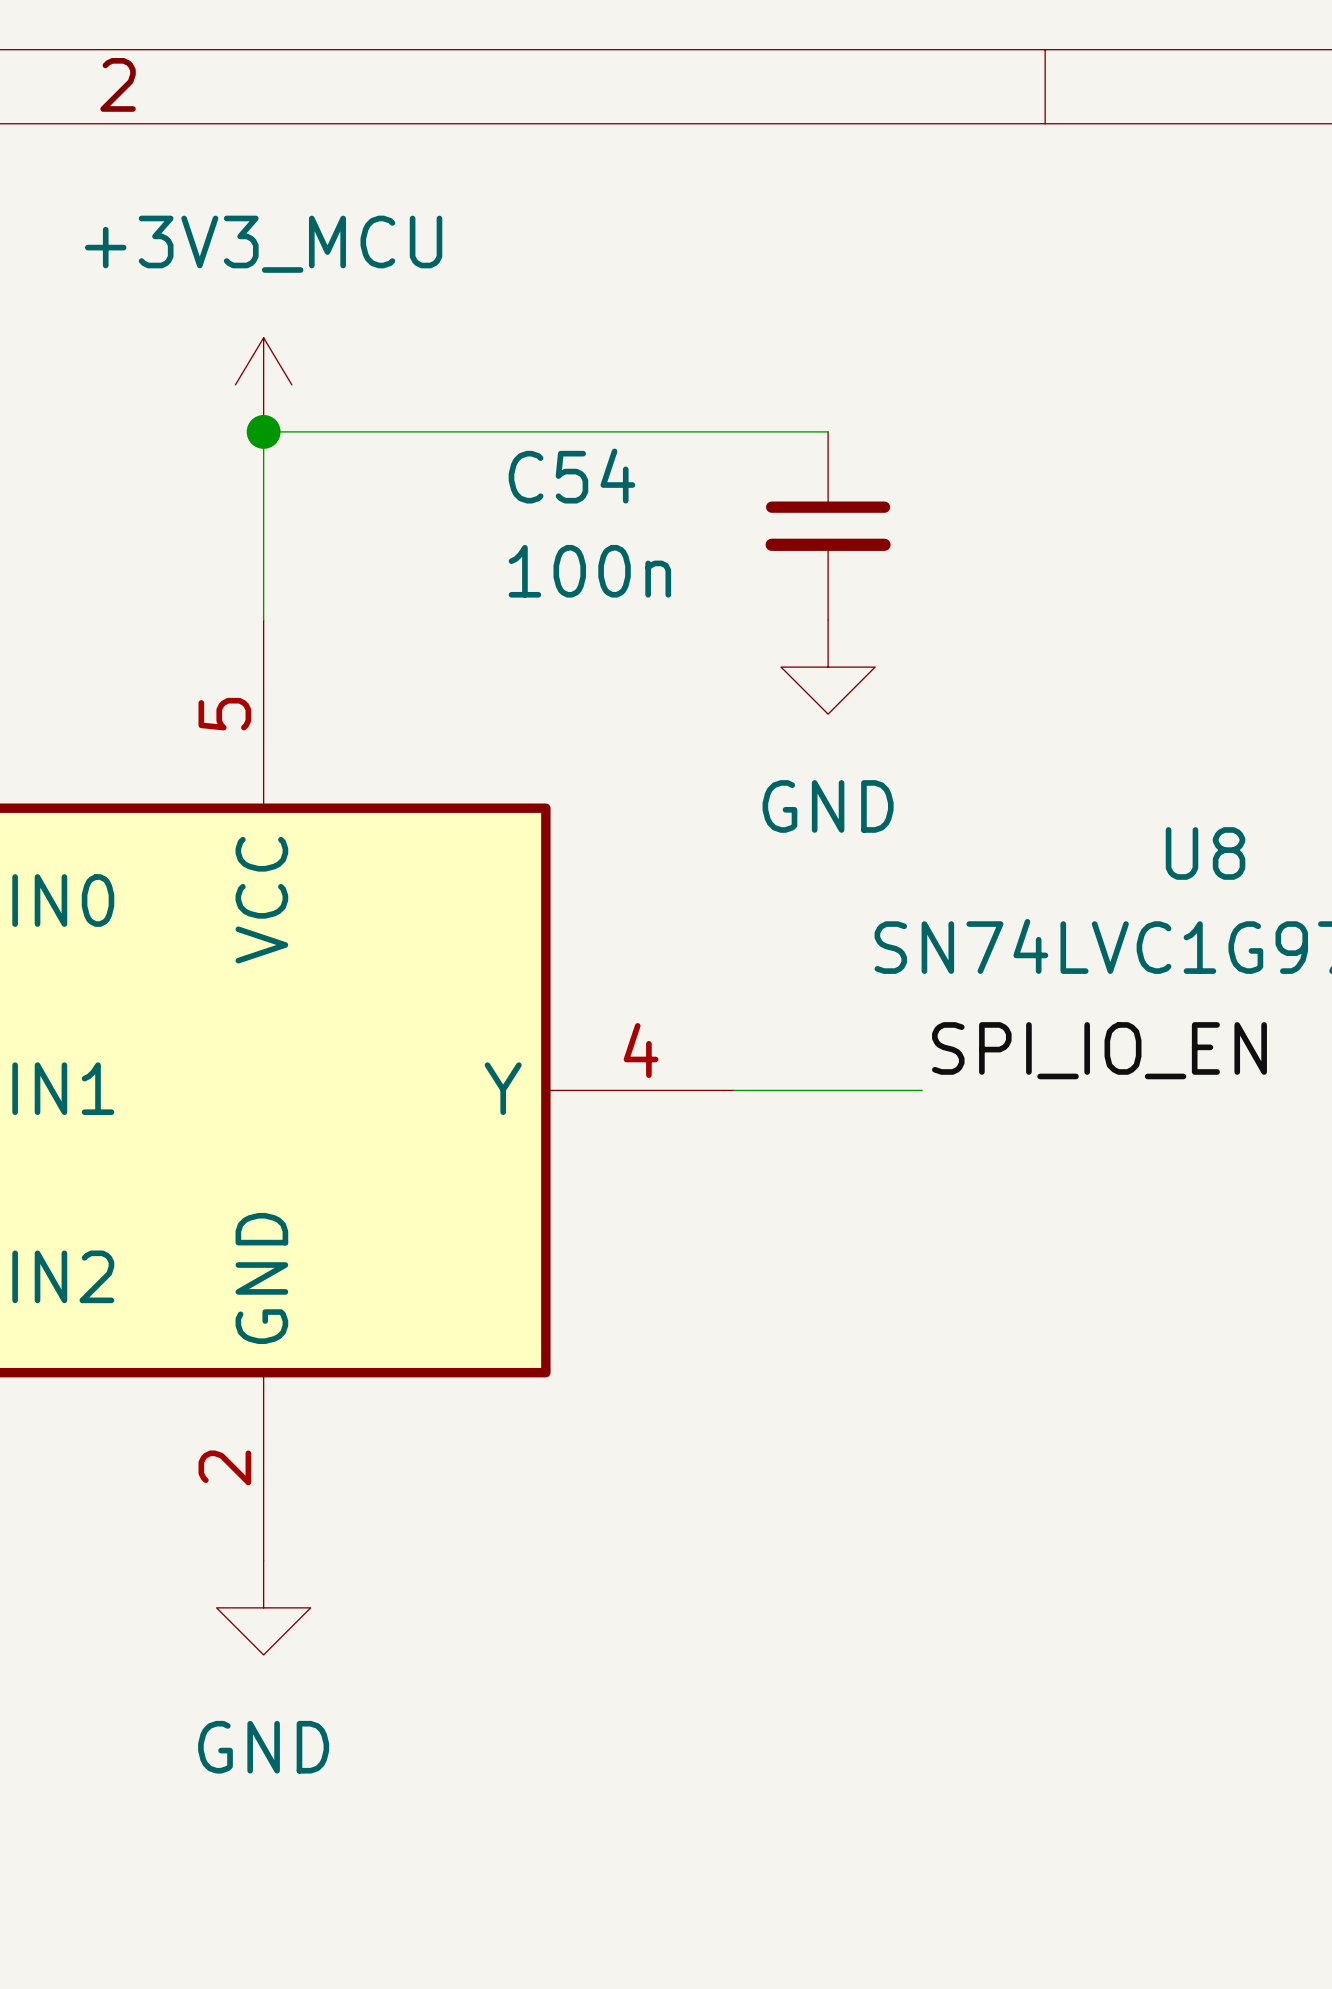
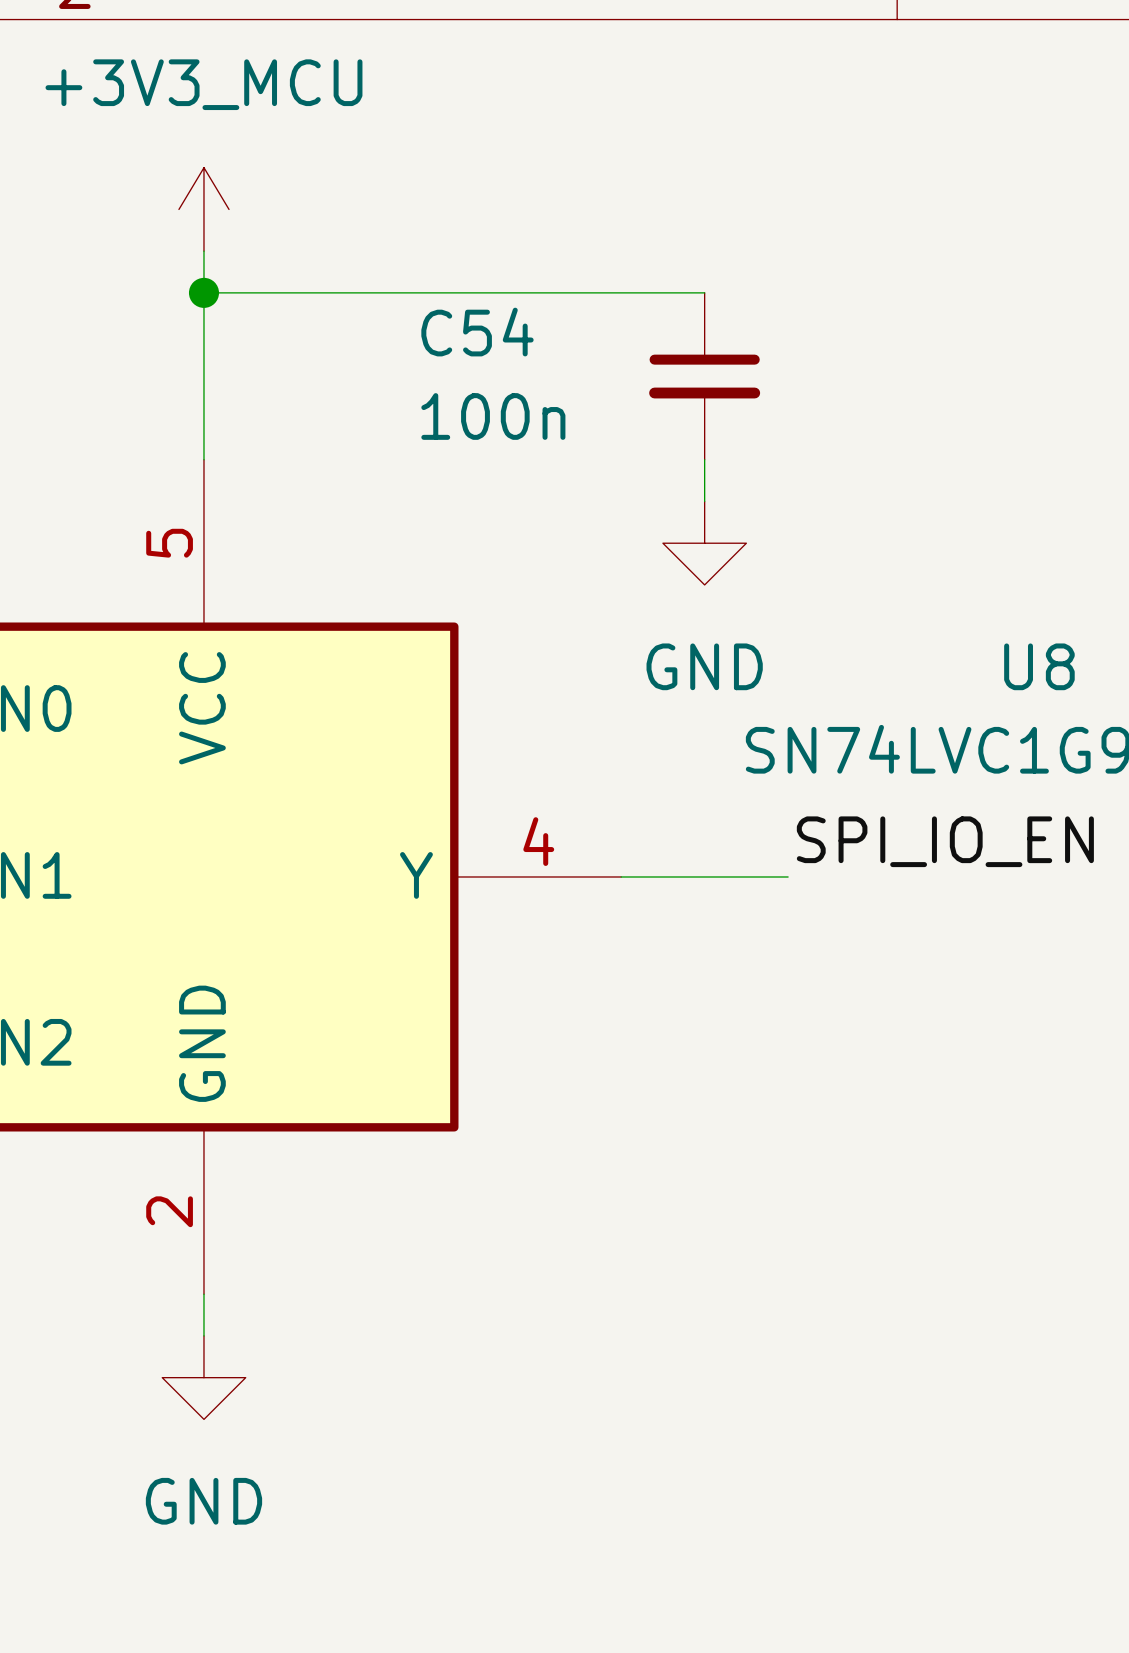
power symbol position: +3V3_MCU (263, 384) -> +3V3_MCU (203, 209)
power symbol position: GND (828, 667) -> GND (704, 543)
power symbol position: GND (263, 1607) -> GND (203, 1377)

